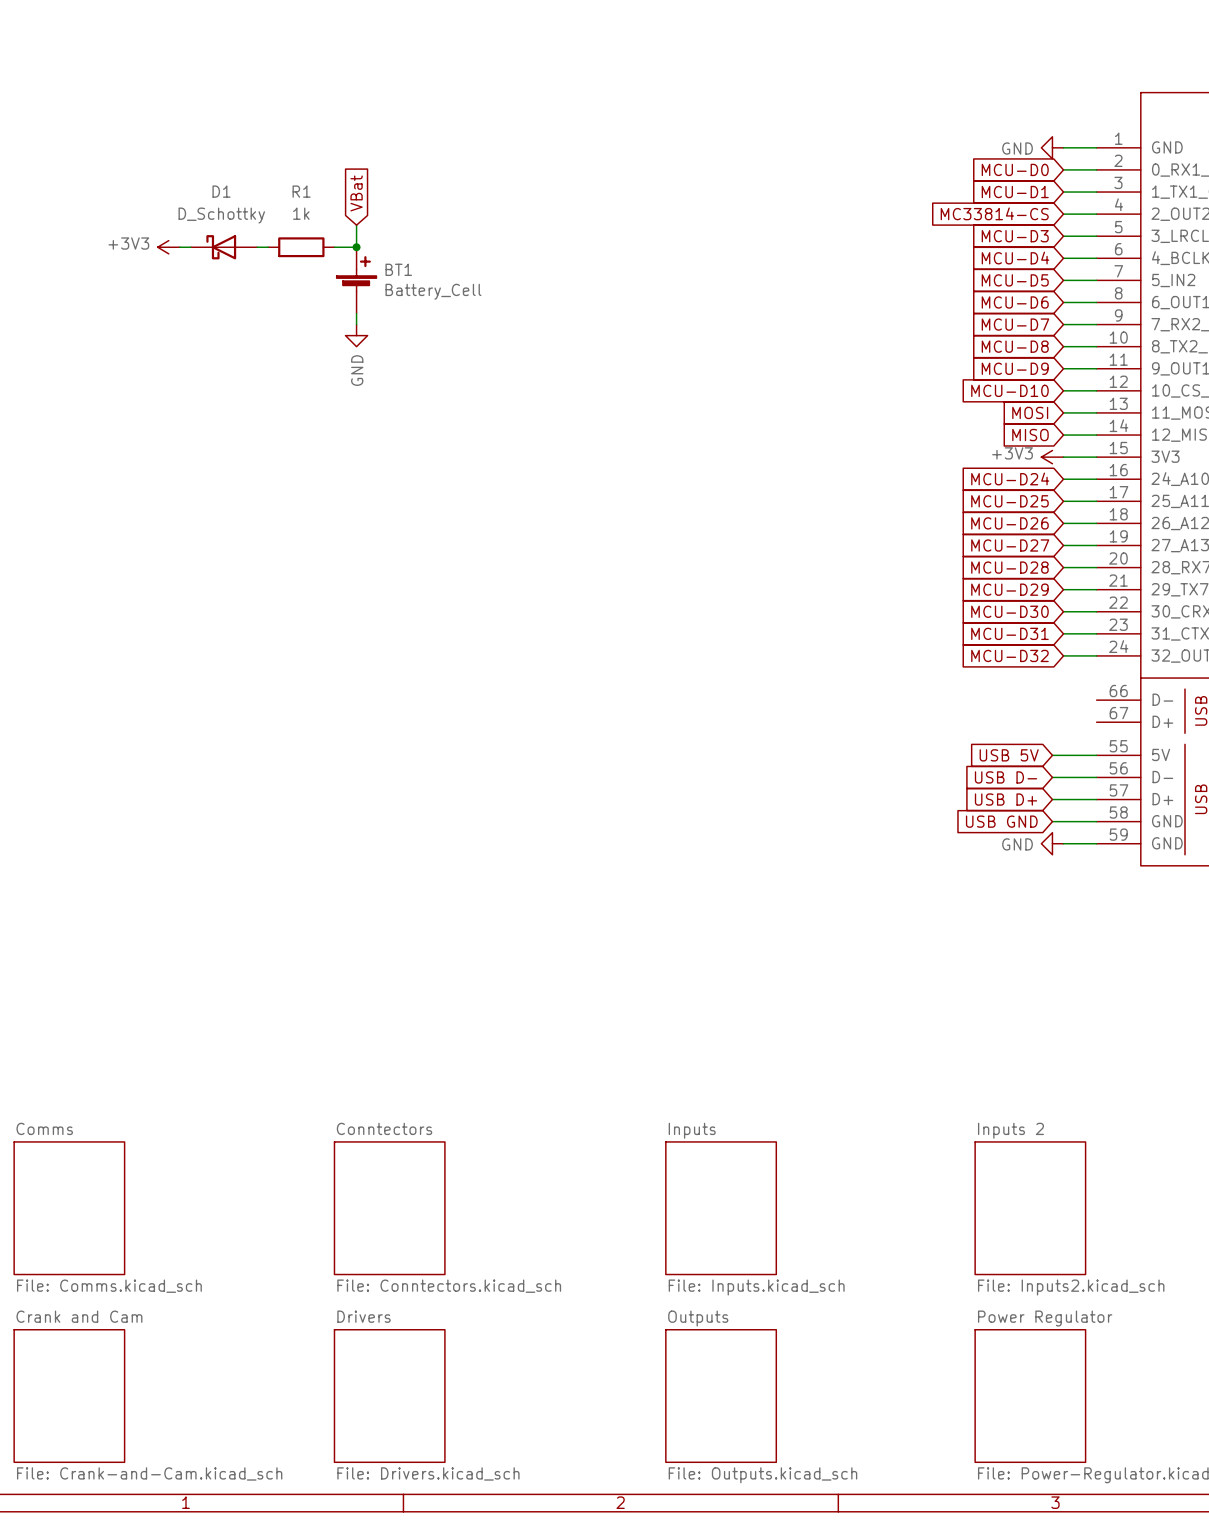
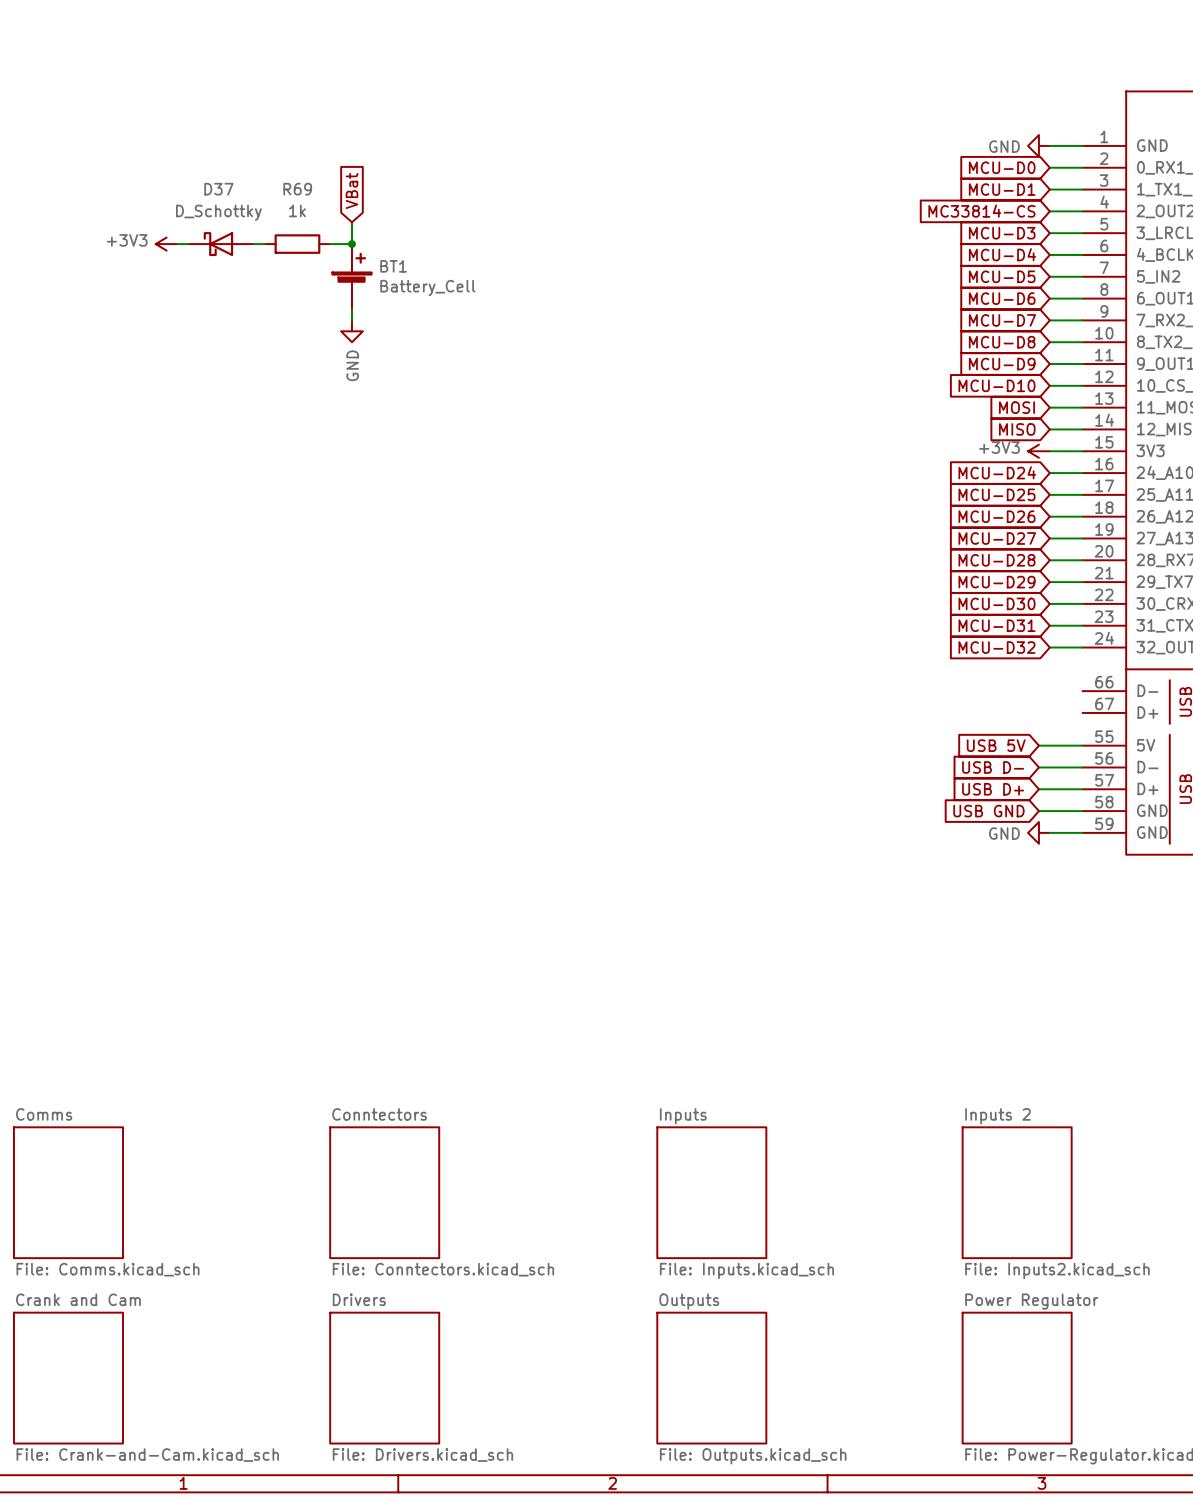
D1 name: D1 (221, 191) -> D37 (218, 189)
R1 name: R1 (301, 191) -> R69 (297, 189)

